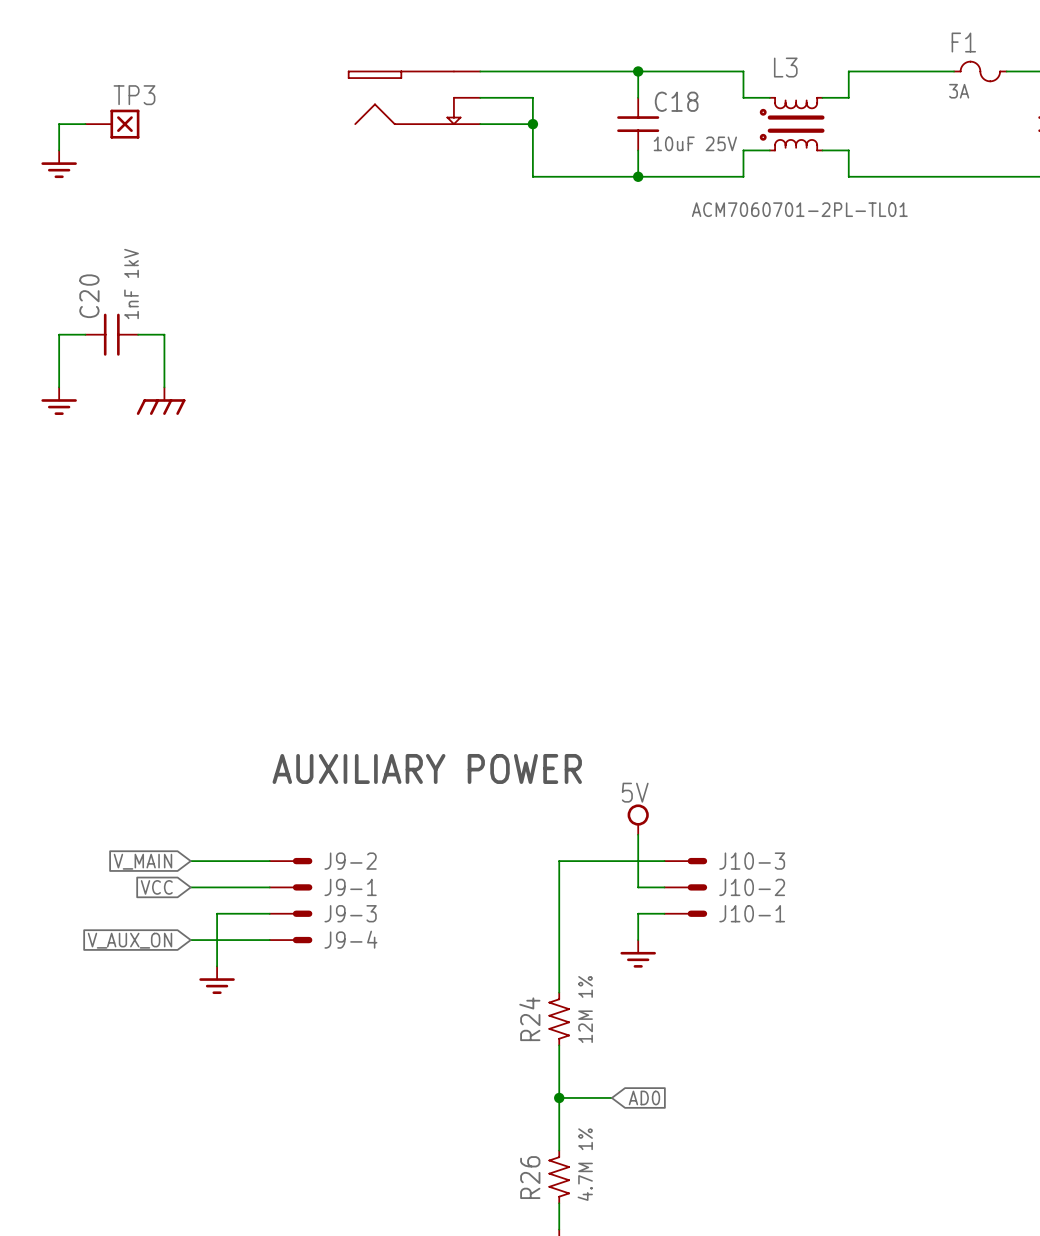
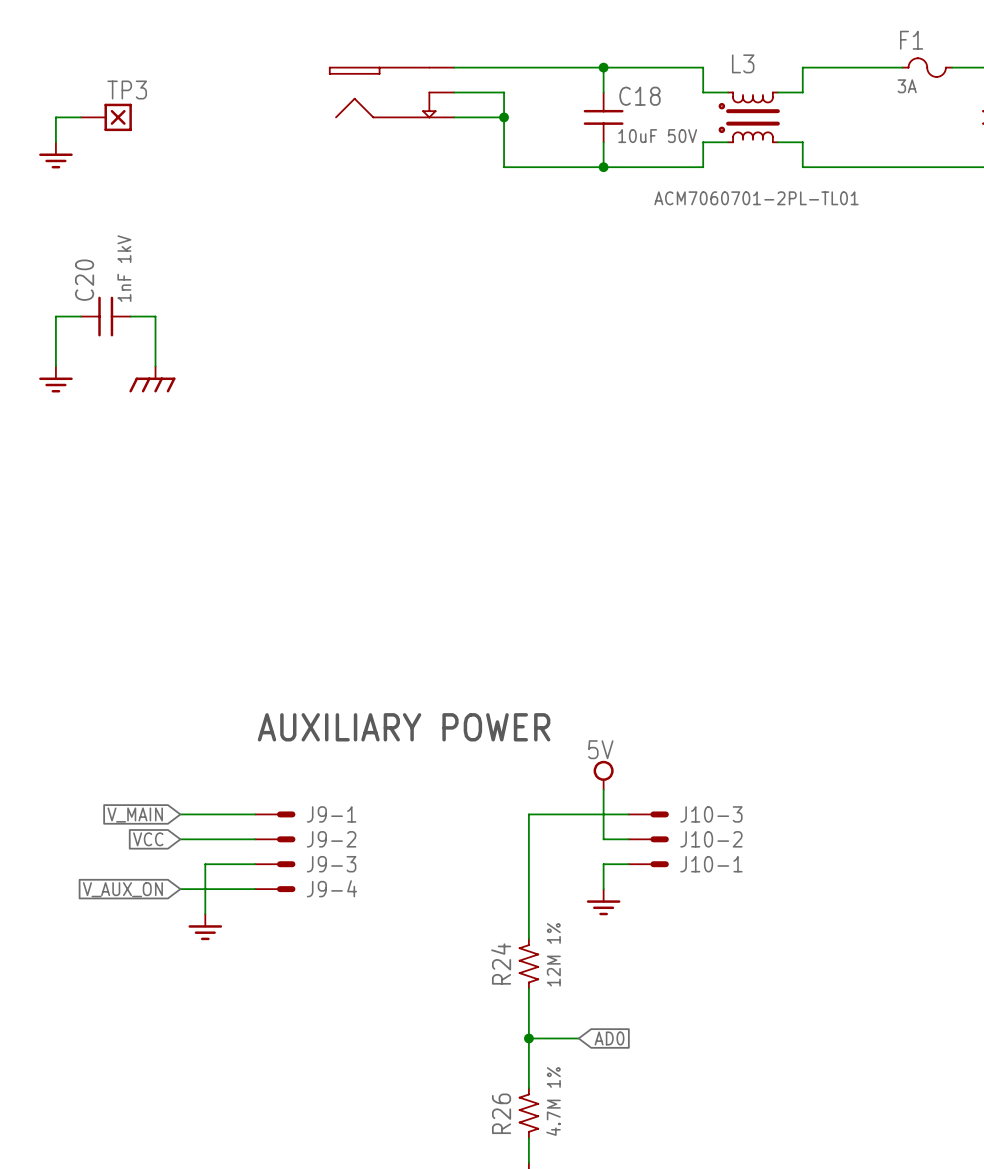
C18 value: 10uF 25V (695, 143) -> 10uF 50V (657, 136)
J9-2 name: J9-2 (350, 861) -> J9-1 (331, 814)
J9-1 name: J9-1 (350, 887) -> J9-2 (331, 839)

